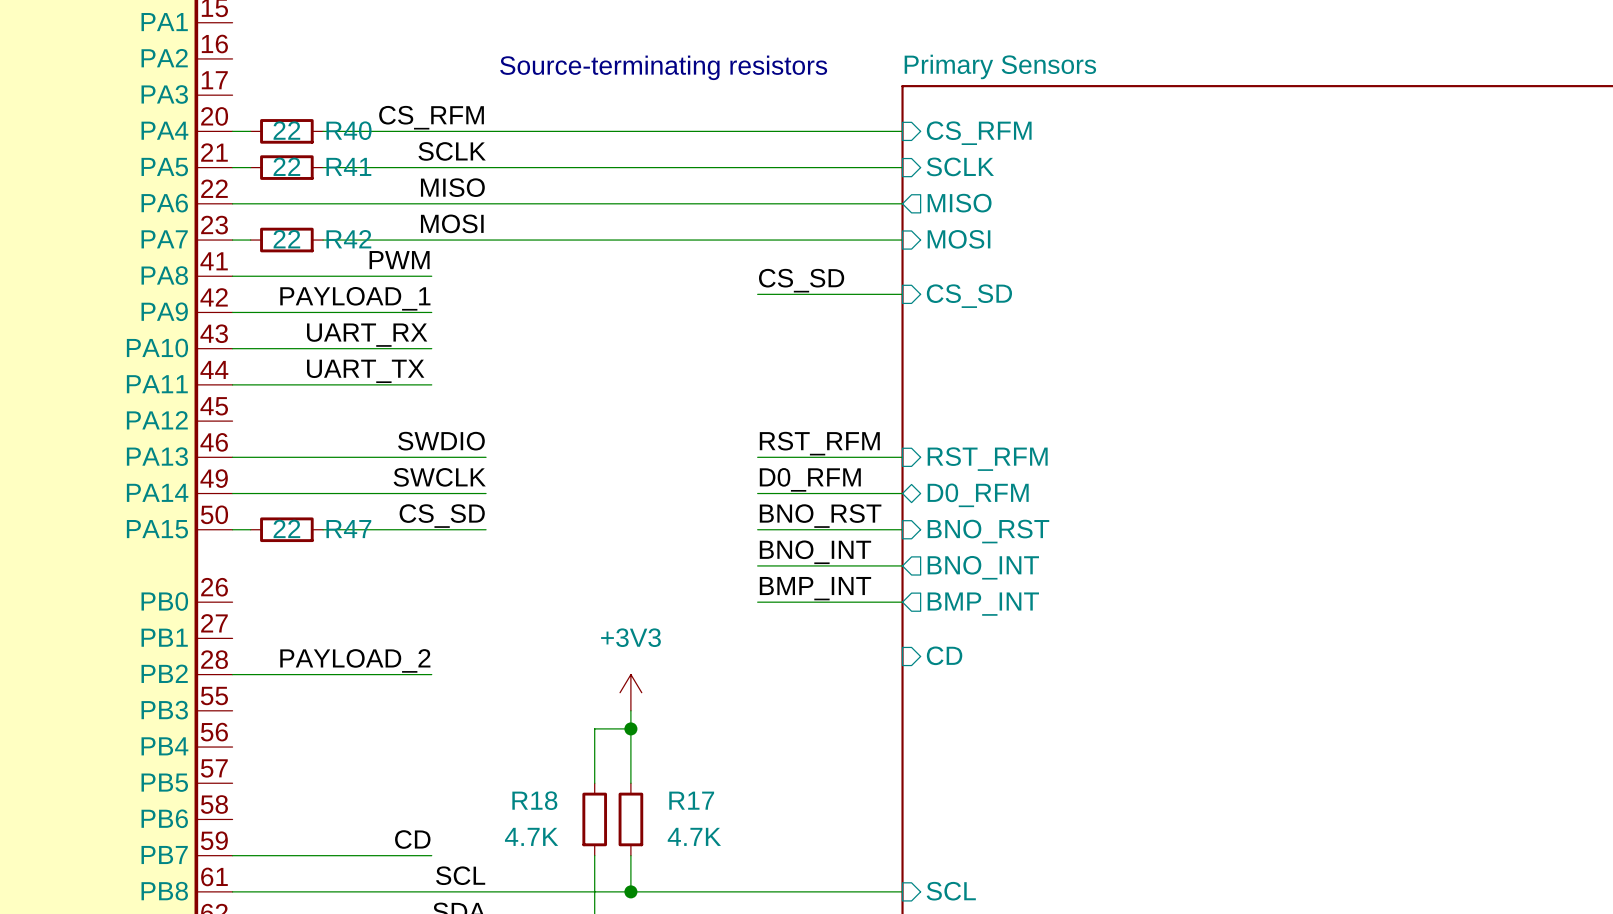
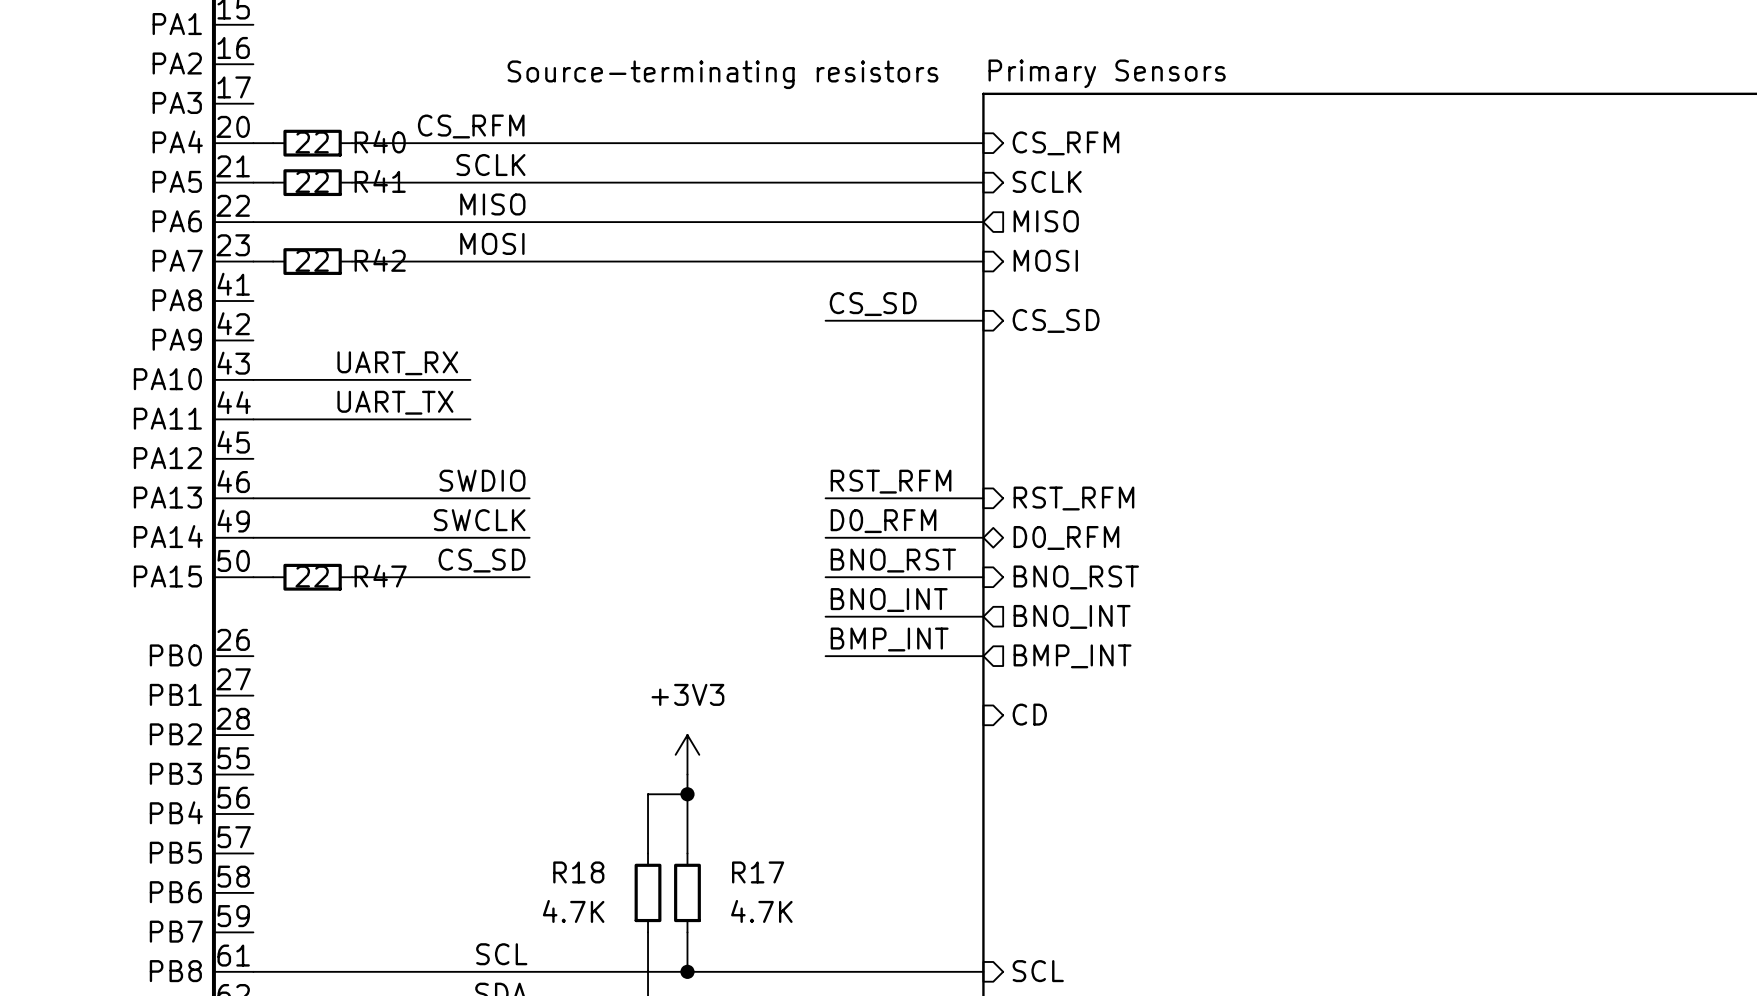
label: PWM (399, 260) -> none
wire: (232, 276) (431, 276) -> none
label: PAYLOAD_1 (355, 298) -> none
wire: (232, 312) (431, 312) -> none
label: PAYLOAD_2 (355, 660) -> none
wire: (232, 674) (431, 674) -> none
label: CD (412, 839) -> none
wire: (232, 855) (431, 855) -> none

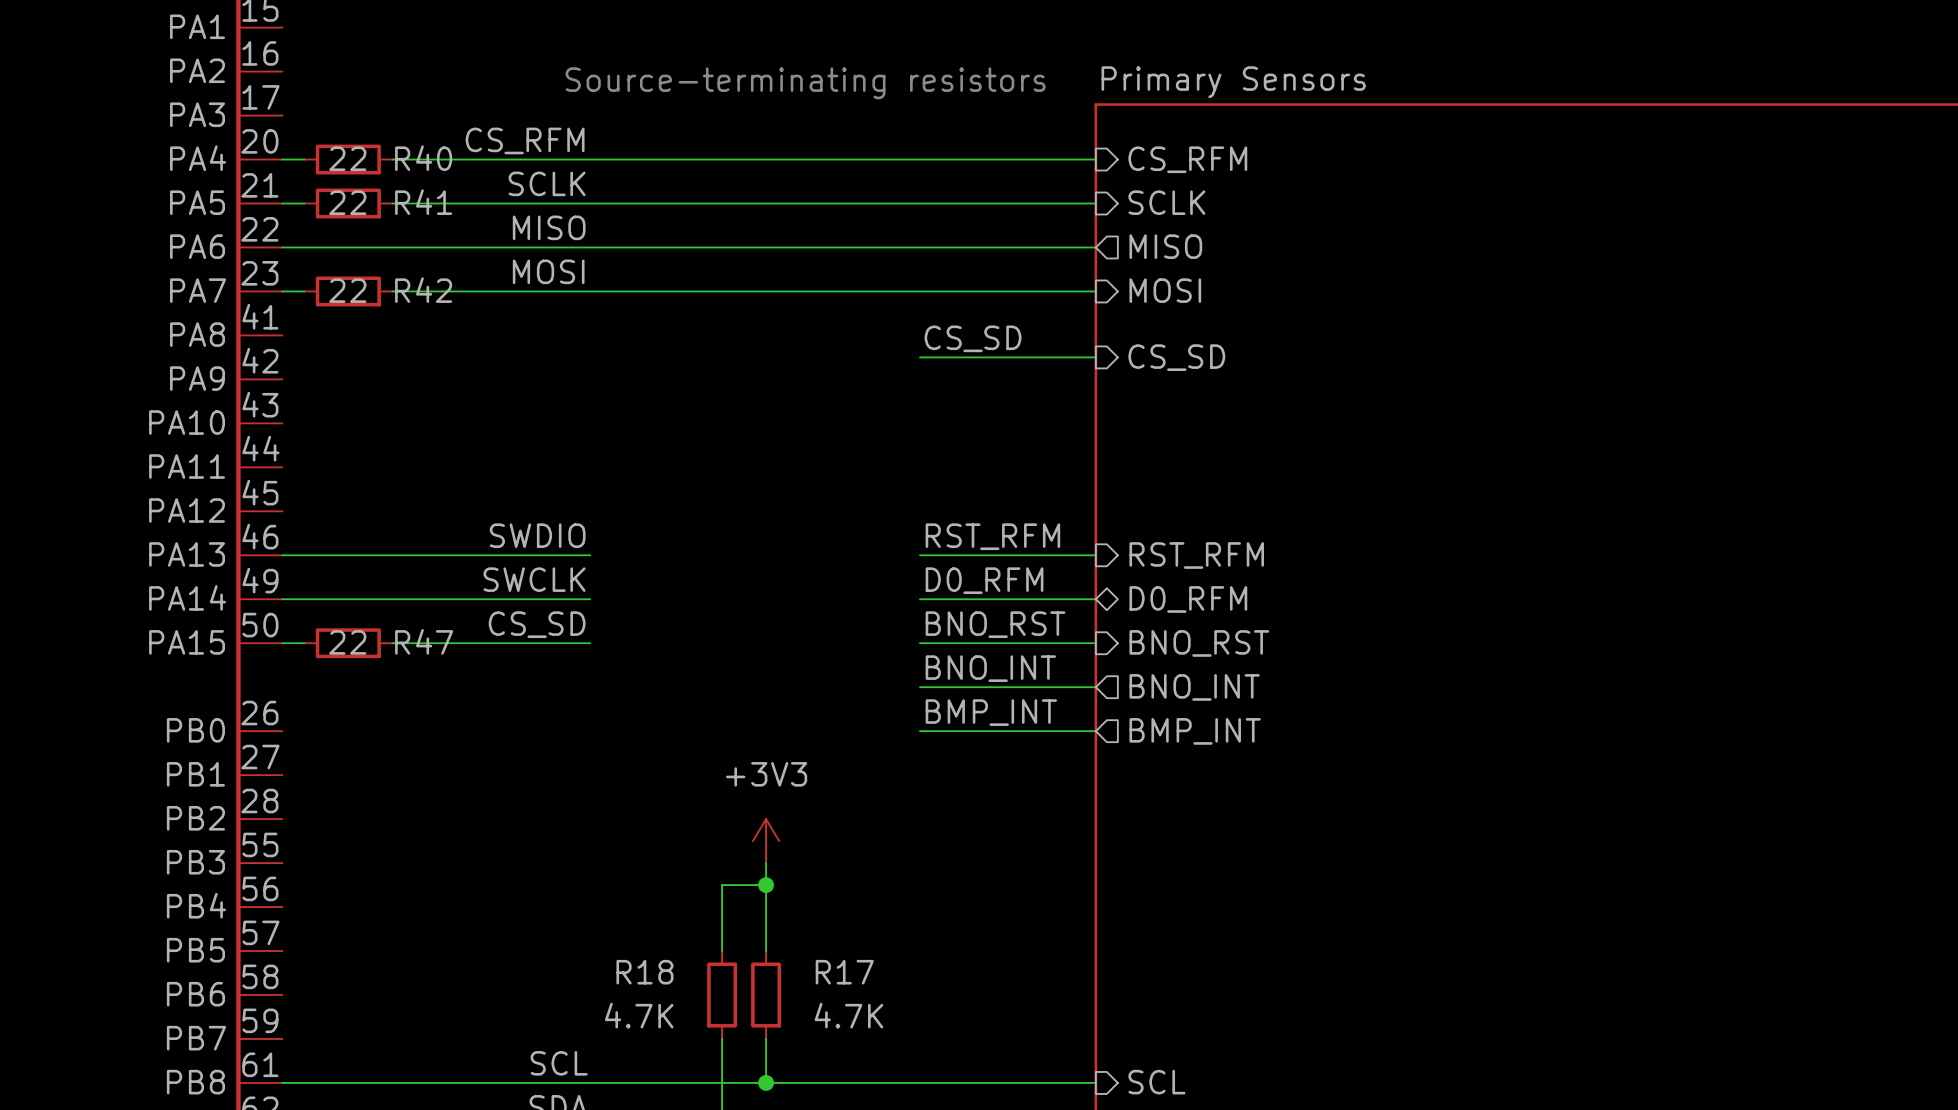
label: UART_RX (397, 363) -> none
wire: (253, 379) (470, 379) -> none
label: UART_TX (395, 402) -> none
wire: (253, 419) (470, 419) -> none
sheet pin: CD (1029, 714) -> none

